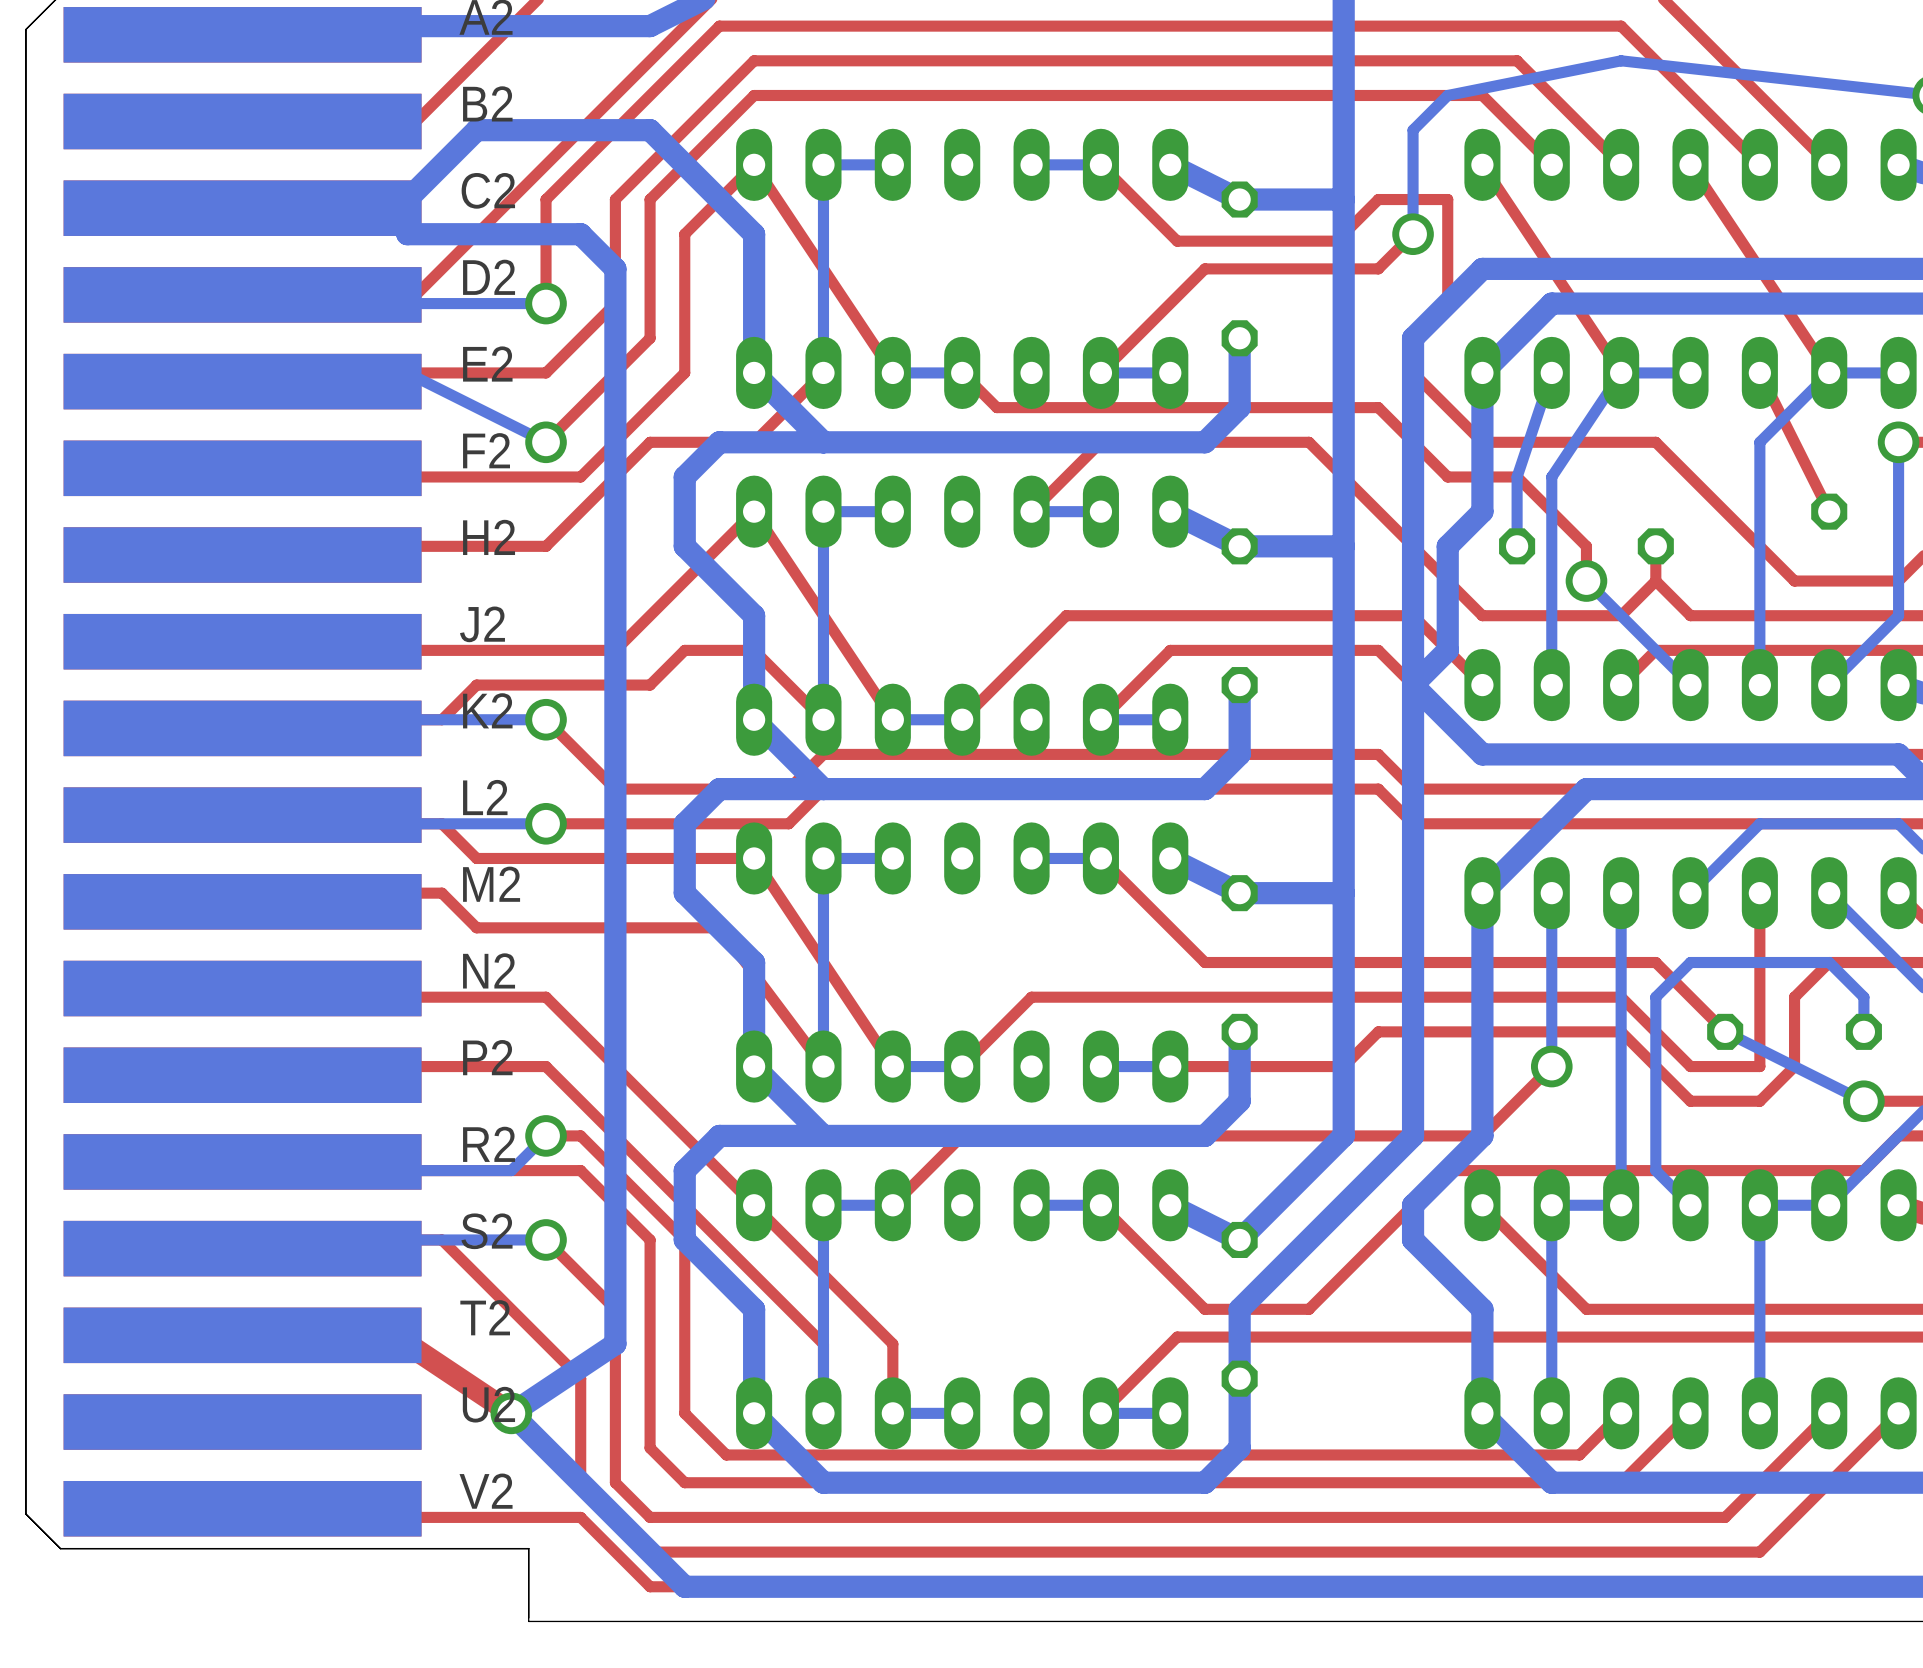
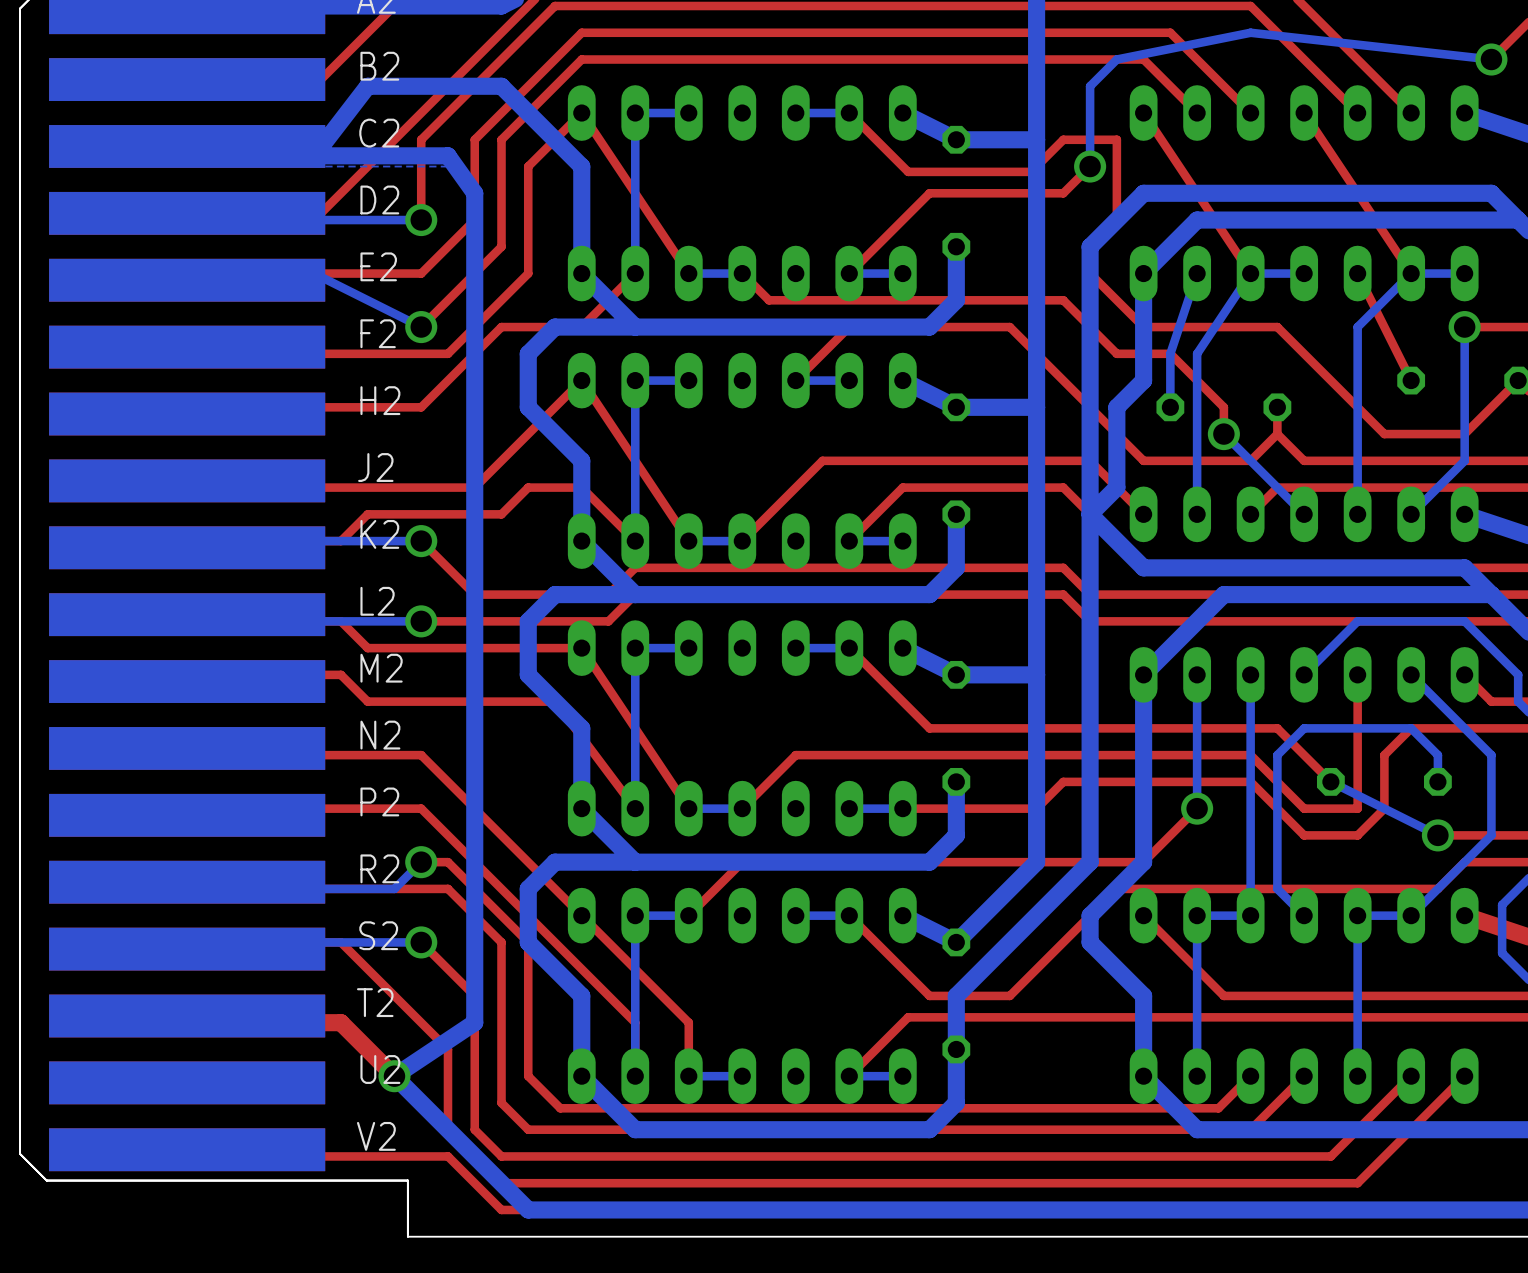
bottom track: (476, 130) (407, 199) -> (367, 86) (314, 155)
bottom track: (407, 199) (407, 234) (580, 234) (615, 268) -> (314, 155) (447, 155) (474, 193)
top track: (407, 1344) (511, 1413) -> (314, 1022) (340, 1022) (394, 1076)

